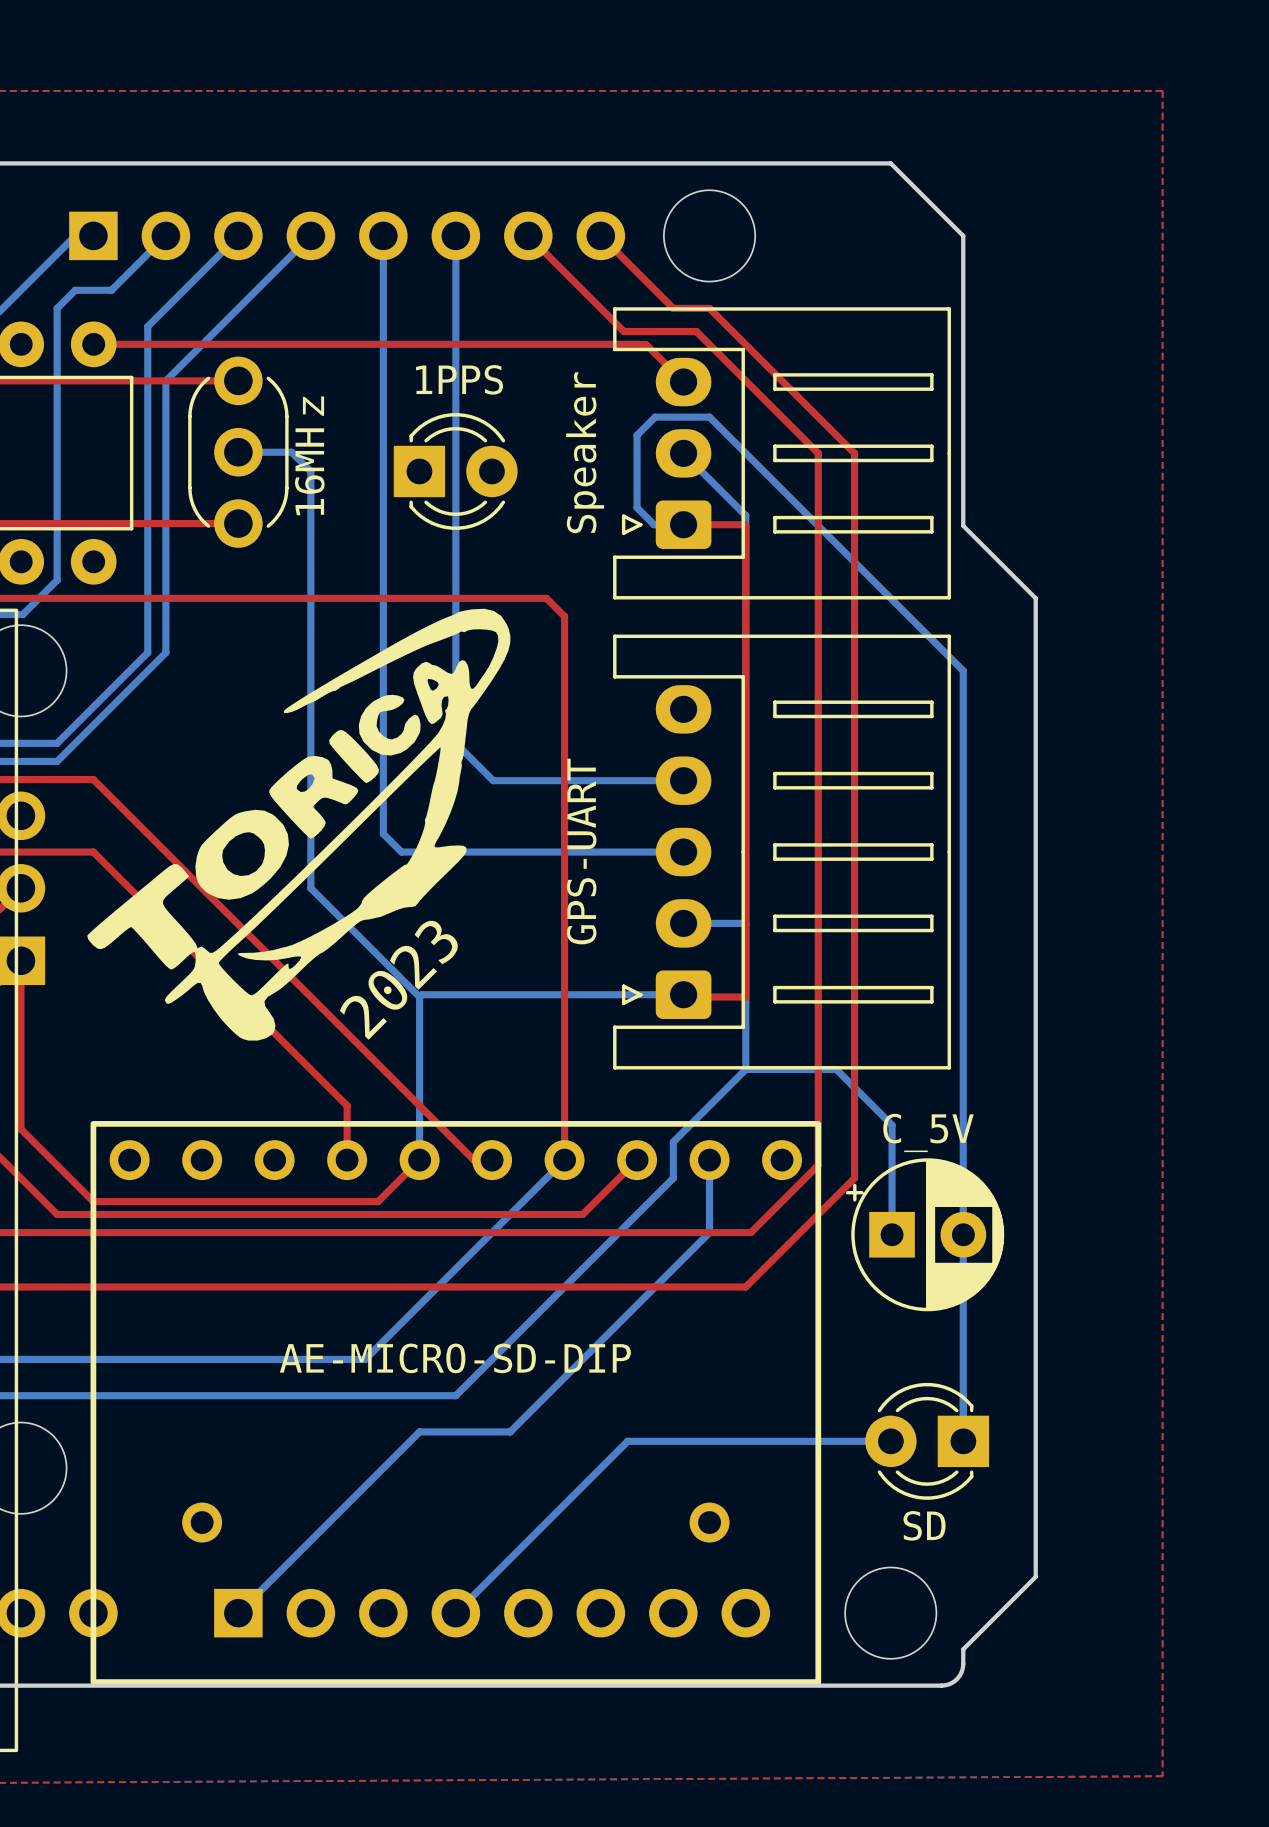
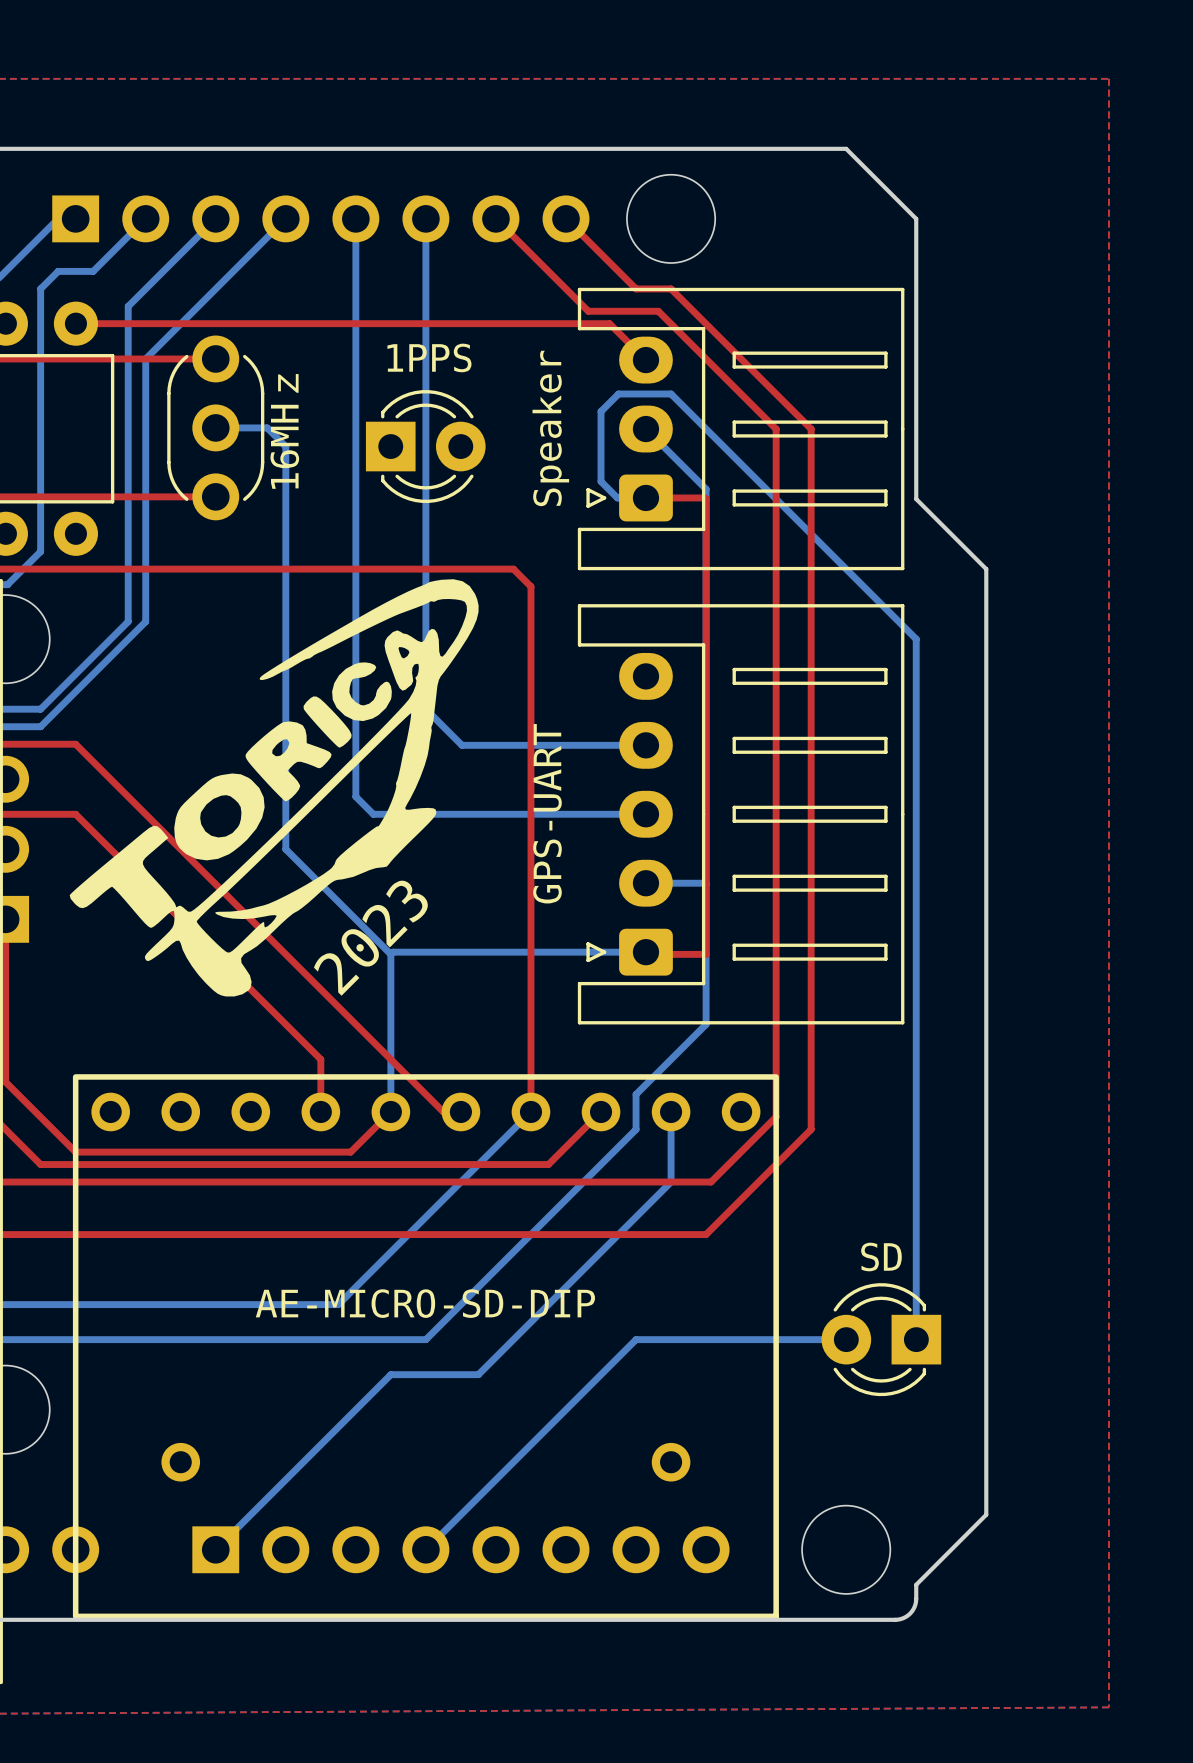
bottom track: (745, 1069) (836, 1069) (892, 1125) (892, 1234) -> none
part: C_5V (925, 1234) -> none
bottom track: (627, 1441) (890, 1441) -> (591, 1383) (636, 1339) (846, 1339)
part position: (927, 1441) -> (881, 1339)
part value position: SD (924, 1525) -> SD (881, 1256)

